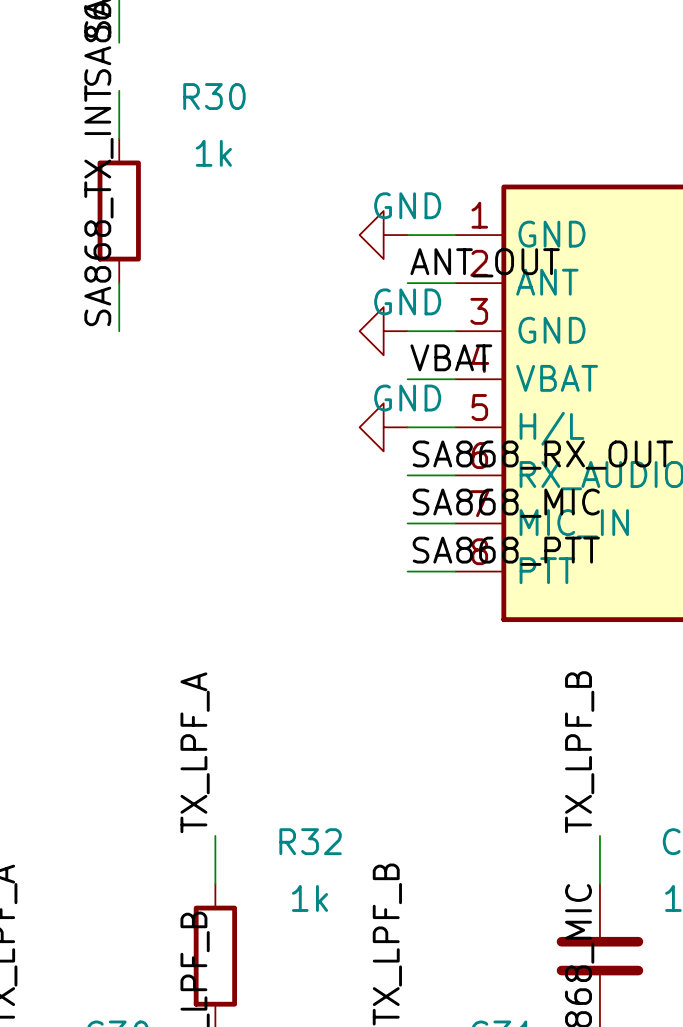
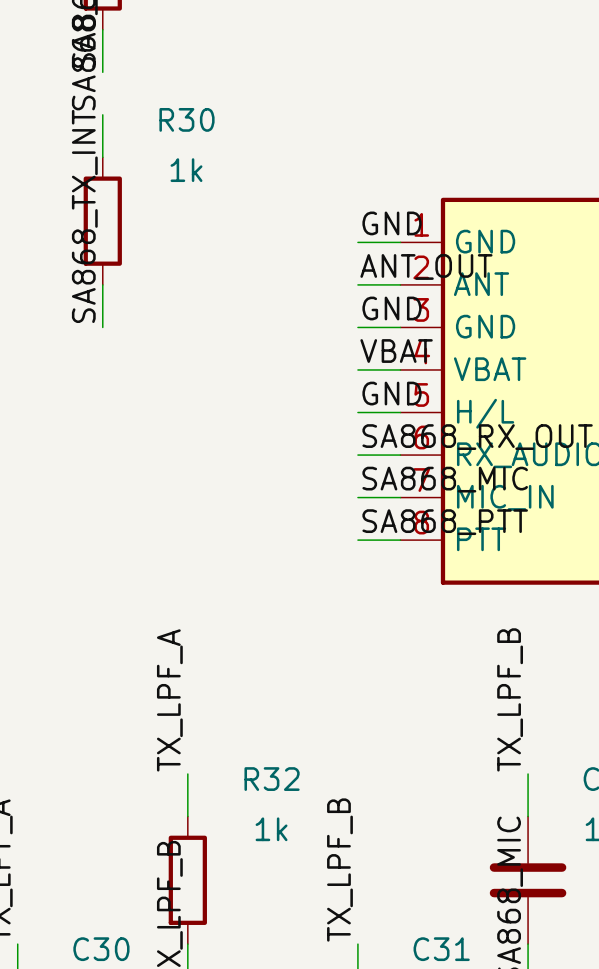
label: none -> GND (392, 223)
power symbol: GND (383, 235) -> none
label: none -> GND (392, 308)
power symbol: GND (383, 331) -> none
label: none -> GND (392, 393)
power symbol: GND (383, 427) -> none

